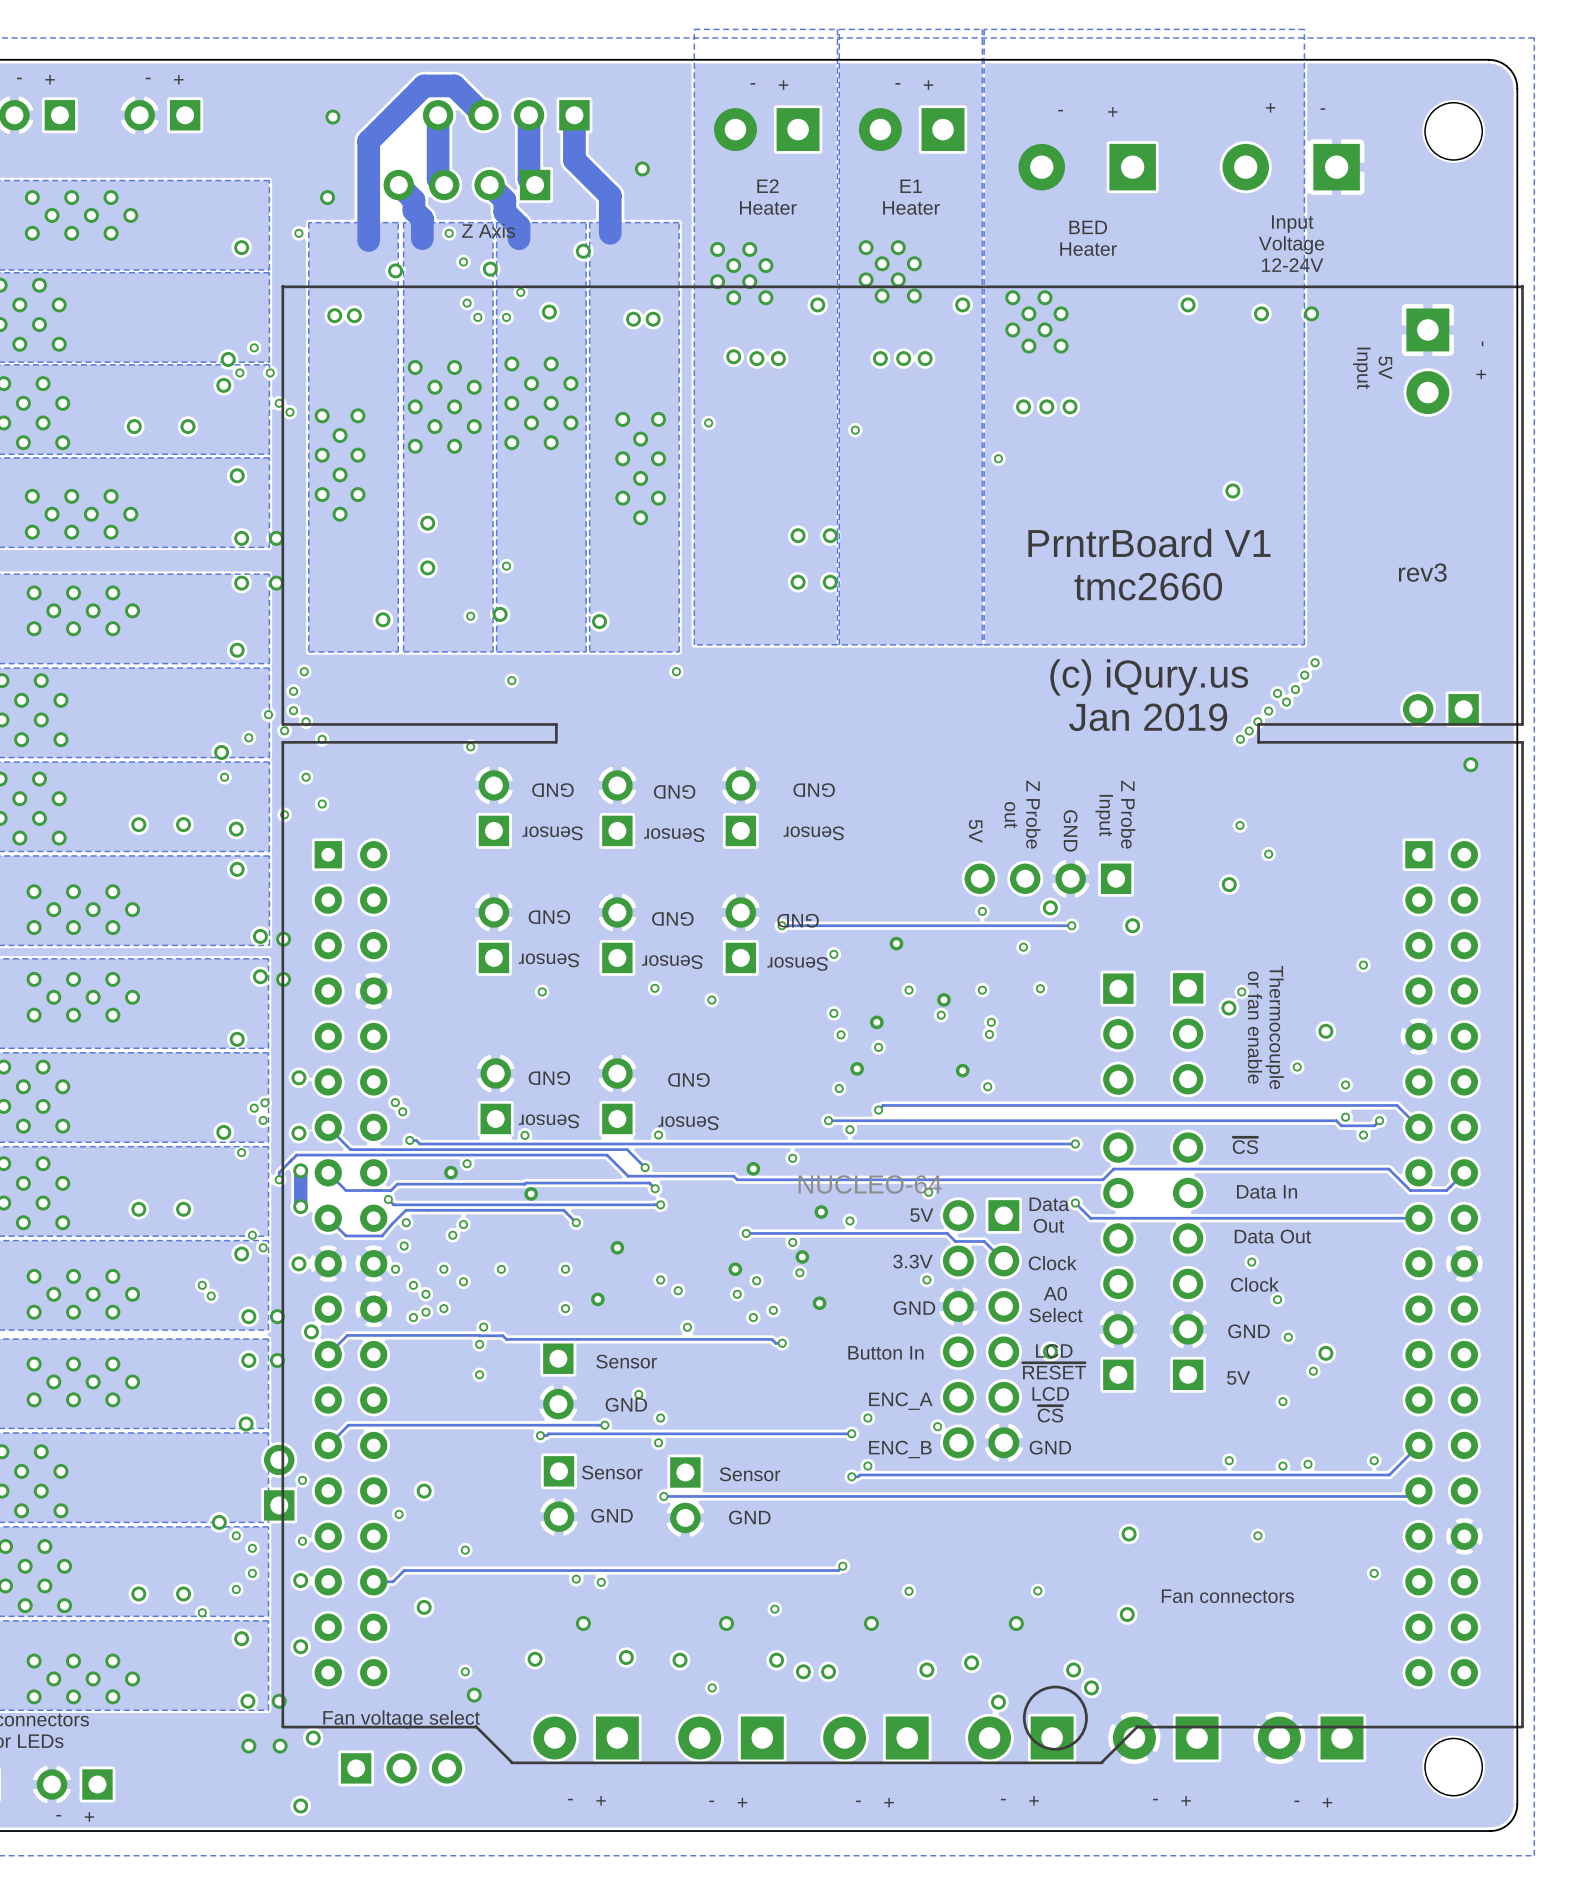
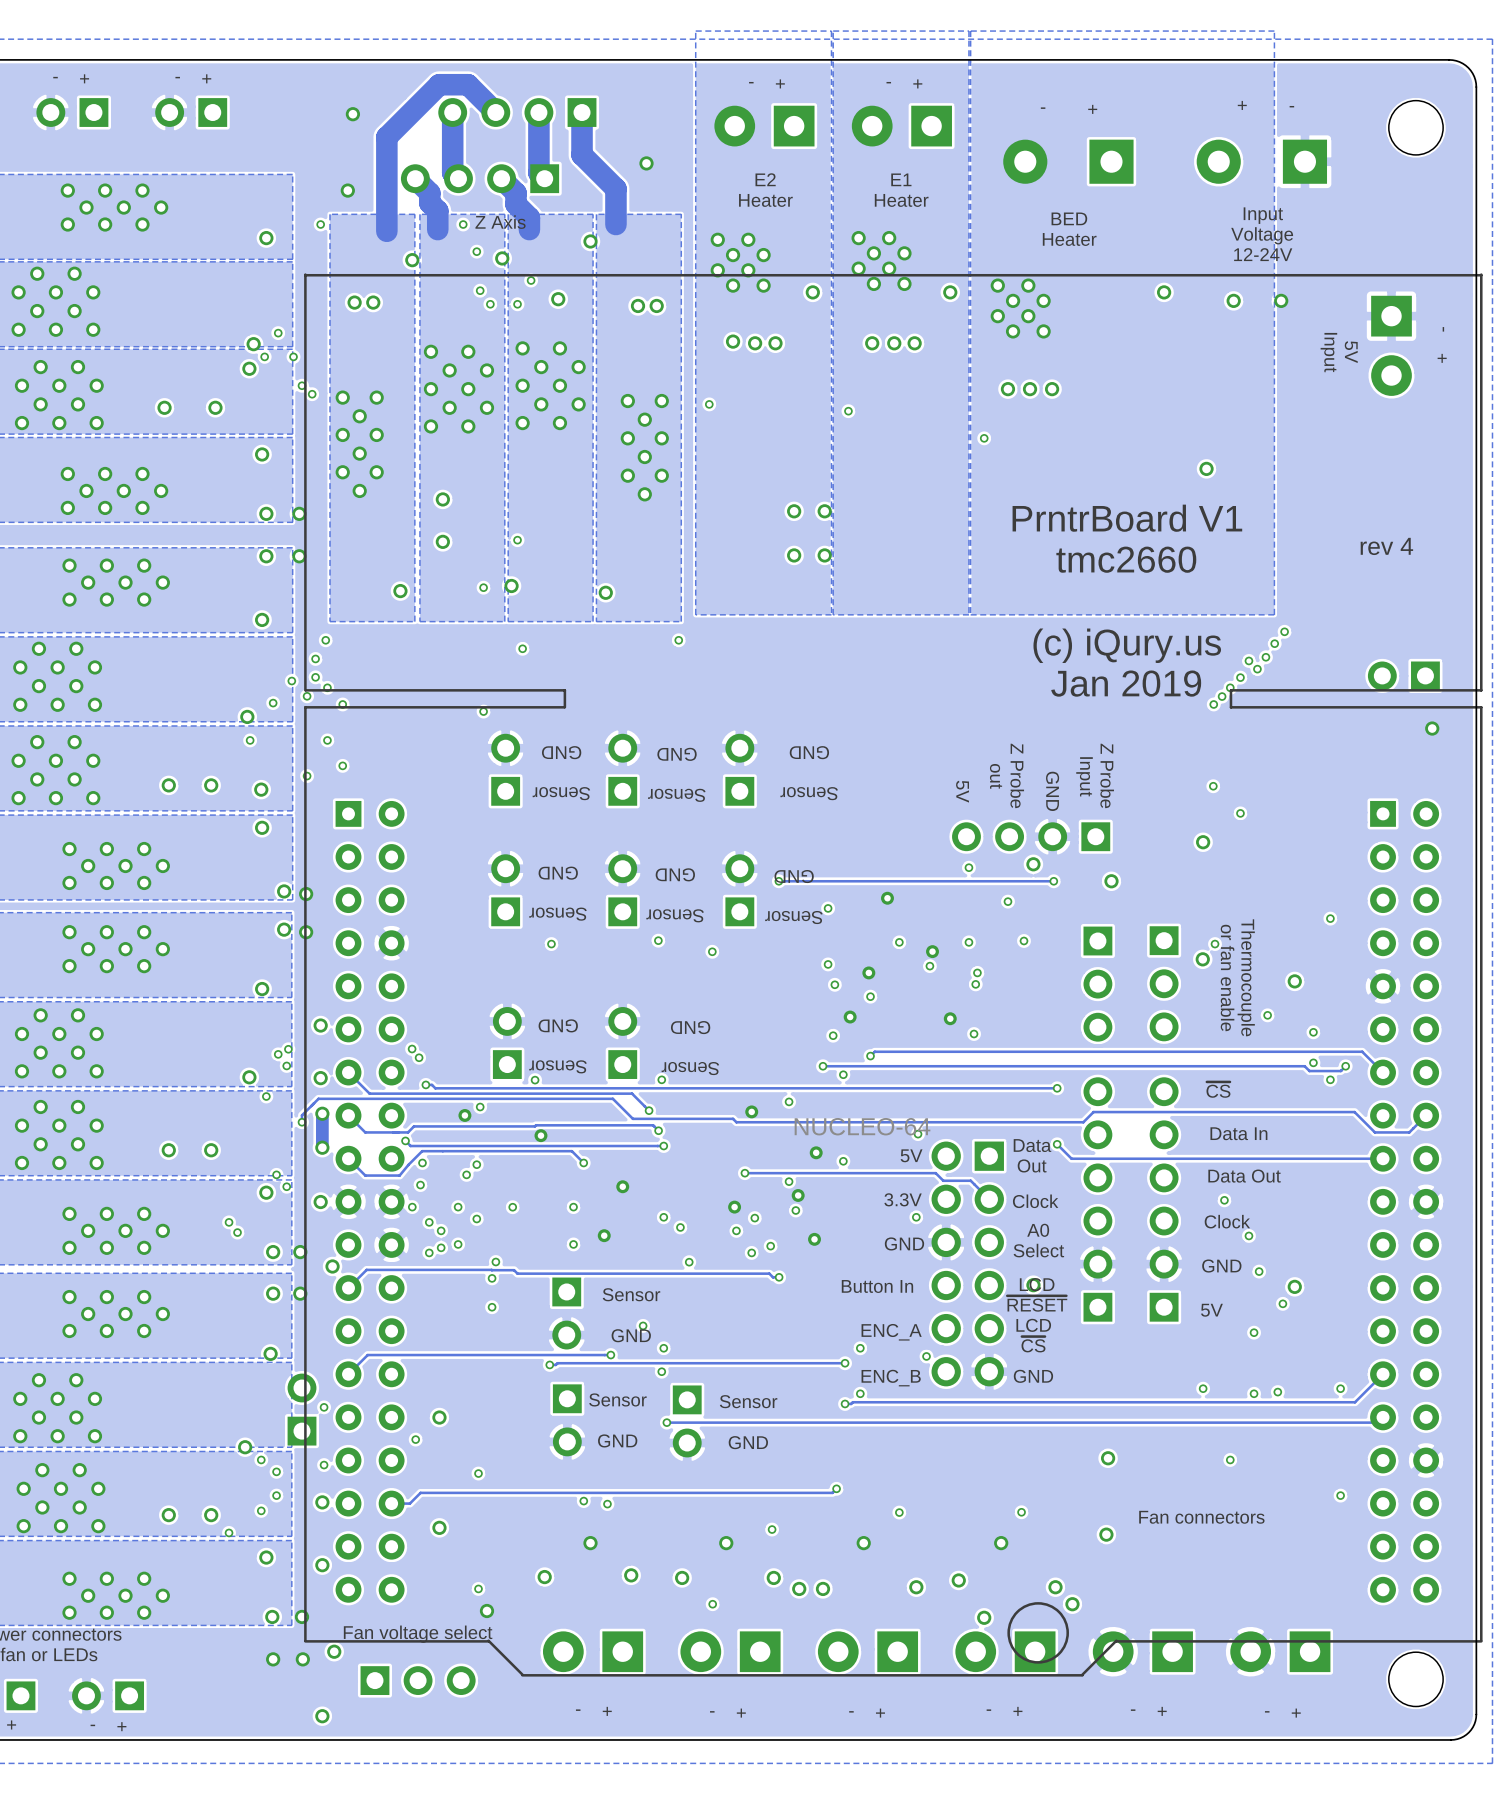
text: rev3 (1422, 572) -> rev 4 (1386, 546)

